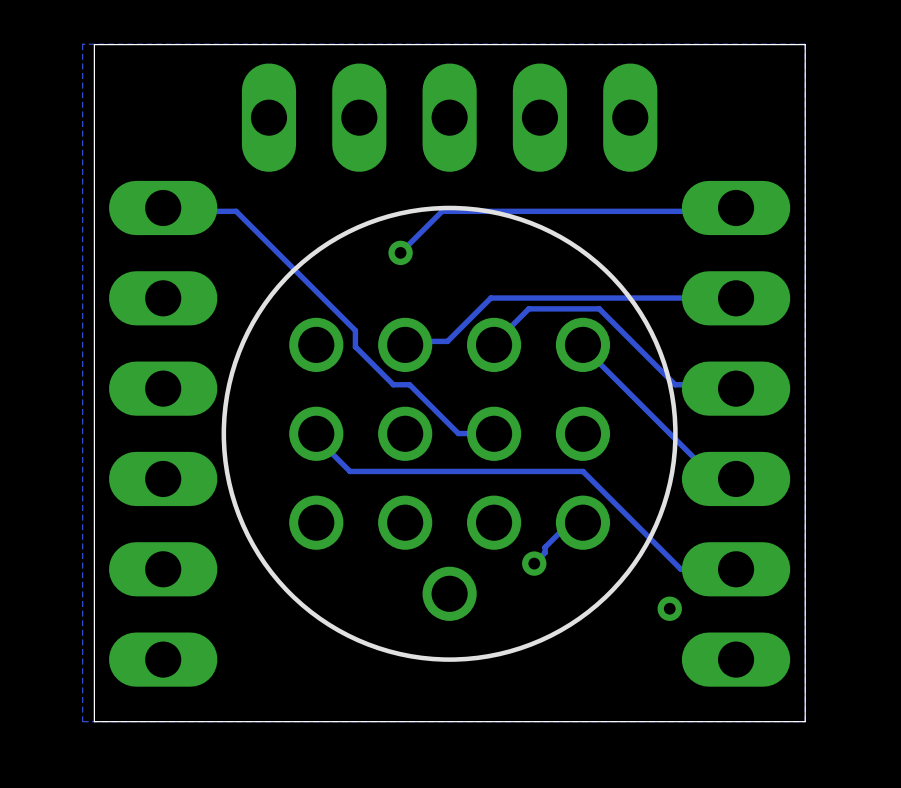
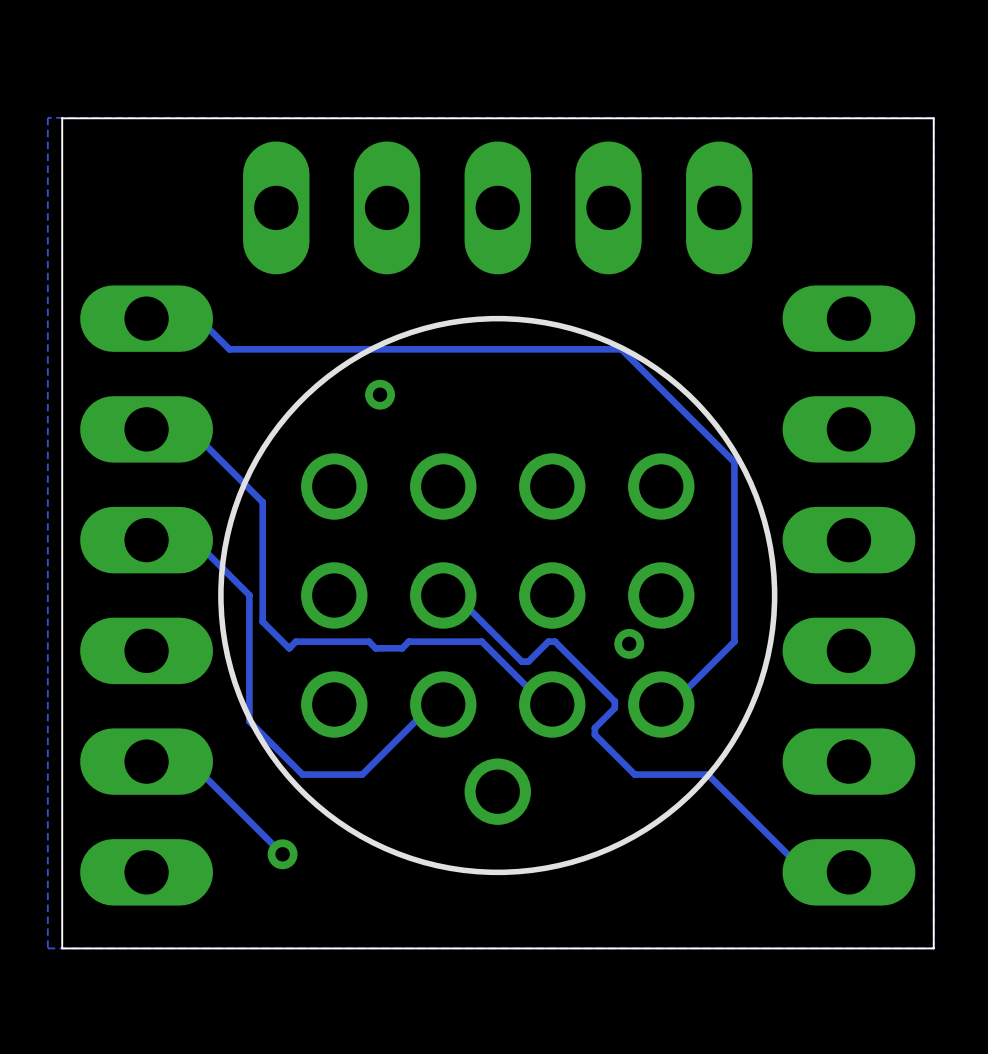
track: (736, 207) (734, 211) (442, 211) (400, 252) -> none
track: (209, 211) (236, 211) (355, 330) (355, 346) (393, 384) (409, 384) (458, 433) (494, 433) -> (202, 322) (229, 349) (621, 349) (734, 462) (734, 641) (674, 701) (661, 701) (661, 704)
via position: (400, 252) -> (380, 394)
track: (736, 298) (490, 298) (447, 341) (409, 341) (405, 344) -> none
track: (494, 344) (528, 308) (599, 308) (675, 384) (734, 384) (736, 388) -> none
track: (582, 344) (713, 476) (734, 476) (736, 478) -> none
track: none -> (146, 540) (149, 542) (196, 542) (249, 595) (249, 721) (302, 774) (362, 774) (428, 708) (442, 708) (443, 704)
track: (316, 433) (317, 438) (350, 471) (377, 471) -> (146, 429) (149, 435) (196, 435) (262, 502) (262, 621) (289, 648) (295, 641) (368, 641) (375, 648) (402, 648) (408, 641)
track: none -> (481, 641) (528, 688) (535, 688) (552, 704)
track: (490, 471) (436, 471) -> (548, 641) (528, 661) (521, 661) (462, 601) (448, 601) (443, 595)
track: (496, 471) (583, 471) (680, 569) (736, 569) -> (555, 641) (614, 701) (614, 708) (594, 728) (594, 734) (634, 774) (707, 774) (800, 867) (847, 867) (848, 872)
via: none -> (629, 643)
track: (582, 522) (577, 525) (566, 525) (545, 547) (545, 552) (534, 563) -> none
via: (534, 563) -> none
track: none -> (146, 761) (149, 767) (196, 767) (282, 854)
via: (669, 608) -> none
via: none -> (282, 854)

